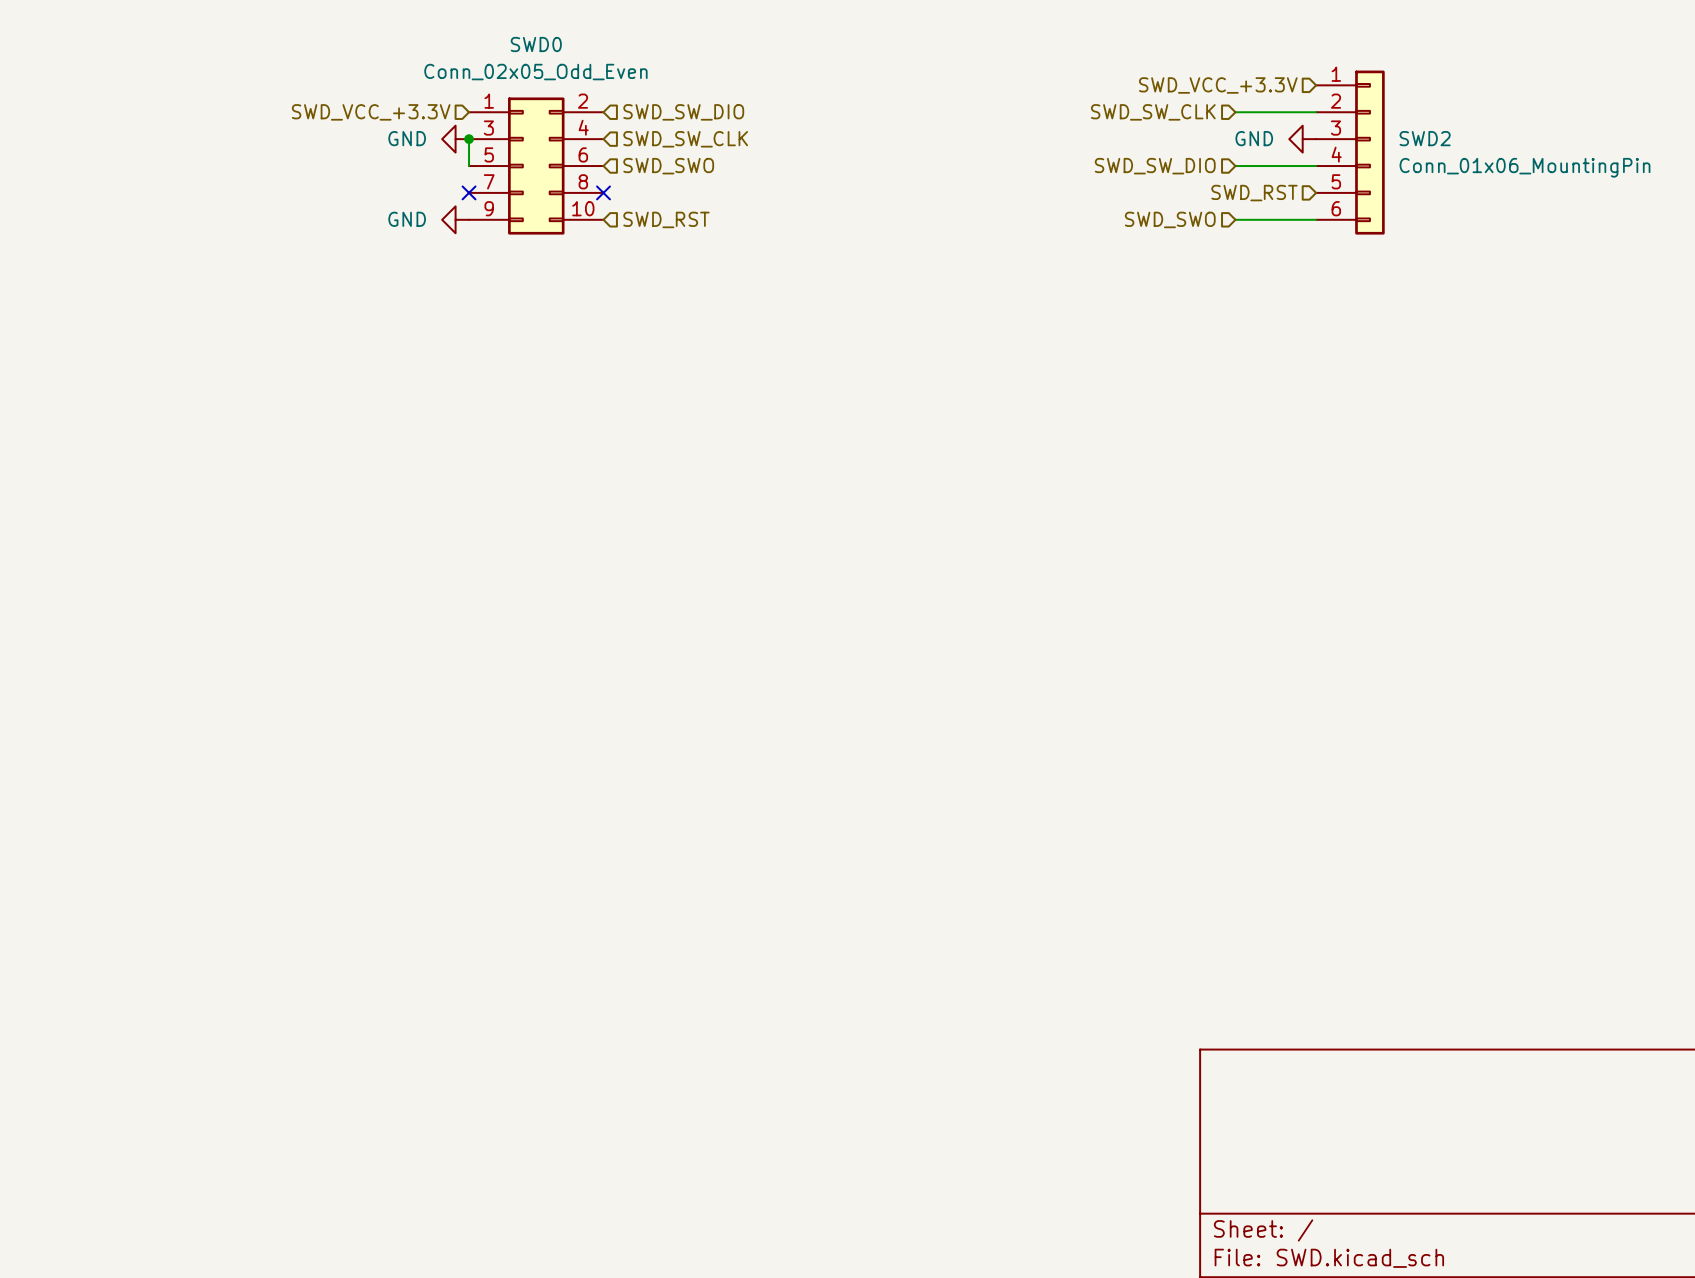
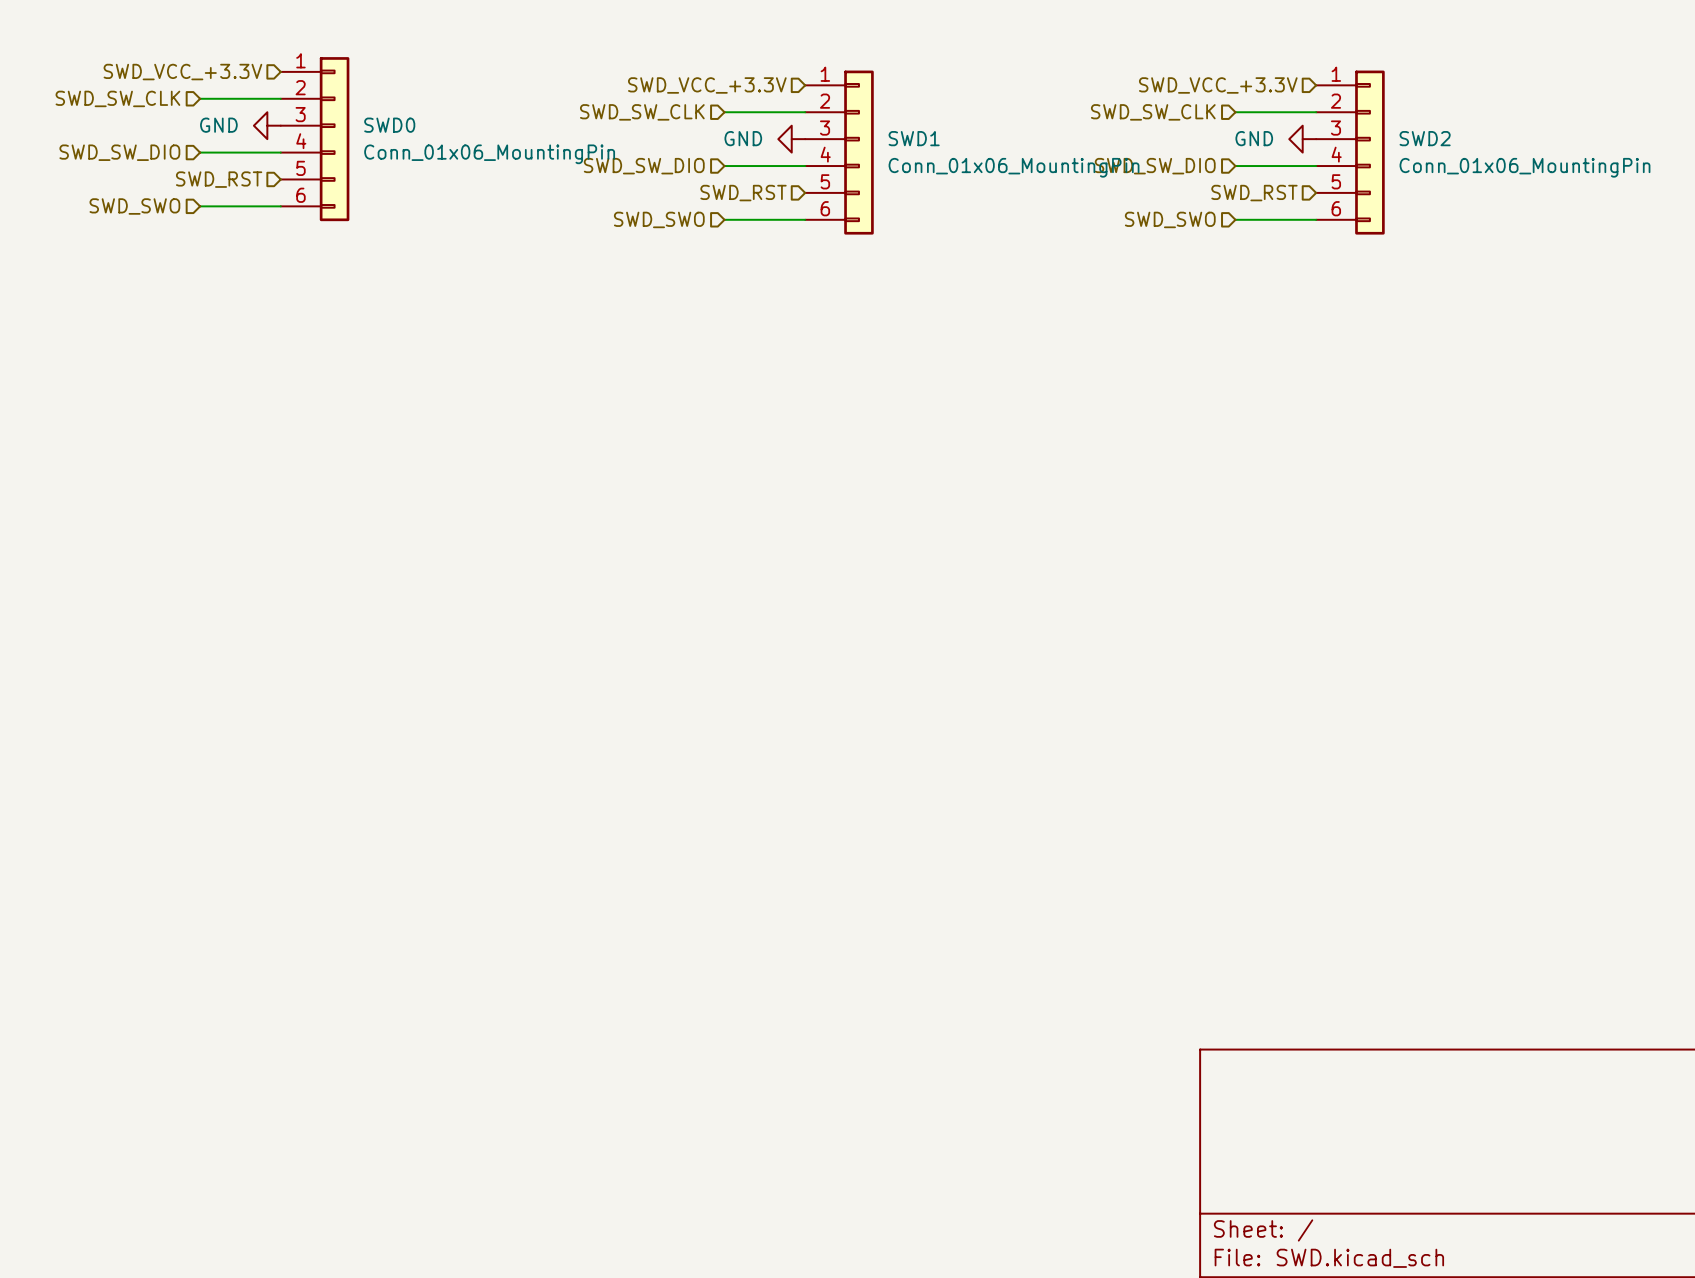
SWD0 name position: SWD0 (536, 44) -> SWD0 (389, 125)
hierarchical label: none -> SWD_VCC_+3.3V (182, 72)
SWD0 value: Conn_02x05_Odd_Even (535, 72) -> Conn_01x06_MountingPin (489, 154)
hierarchical label: none -> SWD_VCC_+3.3V (707, 85)
SWD0 symbol: [469, 97, 604, 235] -> [280, 57, 350, 222]
hierarchical label: none -> SWD_SW_CLK (117, 98)
wire: none -> (200, 98) (280, 98)
hierarchical label: SWD_VCC_+3.3V (371, 112) -> none
hierarchical label rotation: 0° (683, 112) -> 180° (644, 166)
wire: none -> (724, 112) (805, 112)
power symbol: none -> GND (267, 125)
power symbol: GND (455, 139) -> none
wire: (469, 139) (469, 166) -> none
junction: (469, 139) -> none
hierarchical label rotation: 0° (685, 139) -> 180° (642, 112)
power symbol: none -> GND (791, 139)
hierarchical label: none -> SWD_SW_DIO (119, 152)
wire: none -> (200, 152) (280, 152)
SWD1: none -> Conn_01x06_MountingPin (839, 152)
hierarchical label rotation: 0° (668, 166) -> 180° (659, 219)
wire: none -> (724, 166) (805, 166)
hierarchical label: none -> SWD_RST (219, 179)
no-connect mark: (469, 192) -> none
no-connect mark: (603, 192) -> none
hierarchical label: none -> SWD_SWO (134, 206)
wire: none -> (200, 206) (280, 206)
power symbol: GND (455, 219) -> none
hierarchical label rotation: 0° (666, 219) -> 180° (743, 193)
wire: none -> (724, 219) (805, 219)

